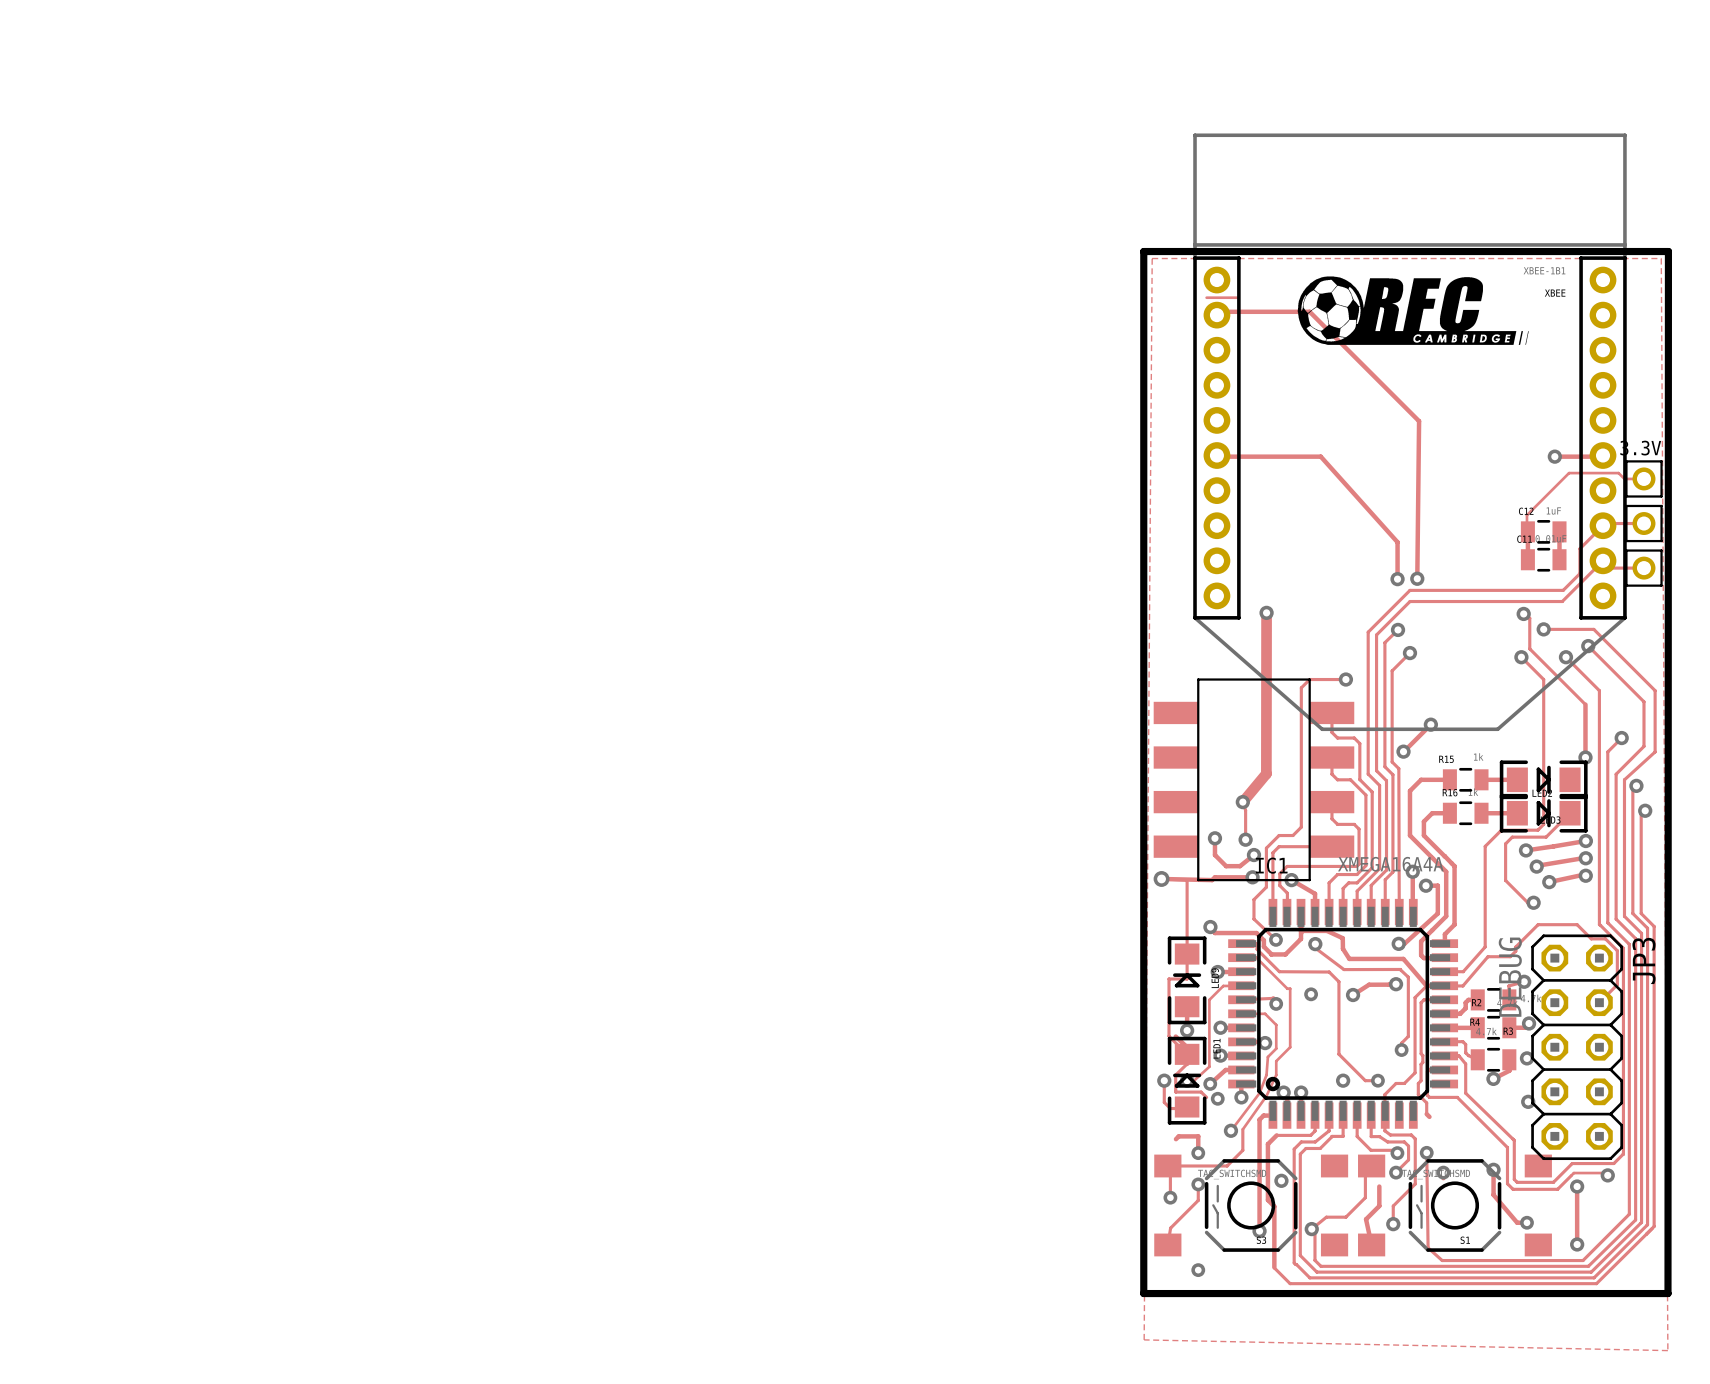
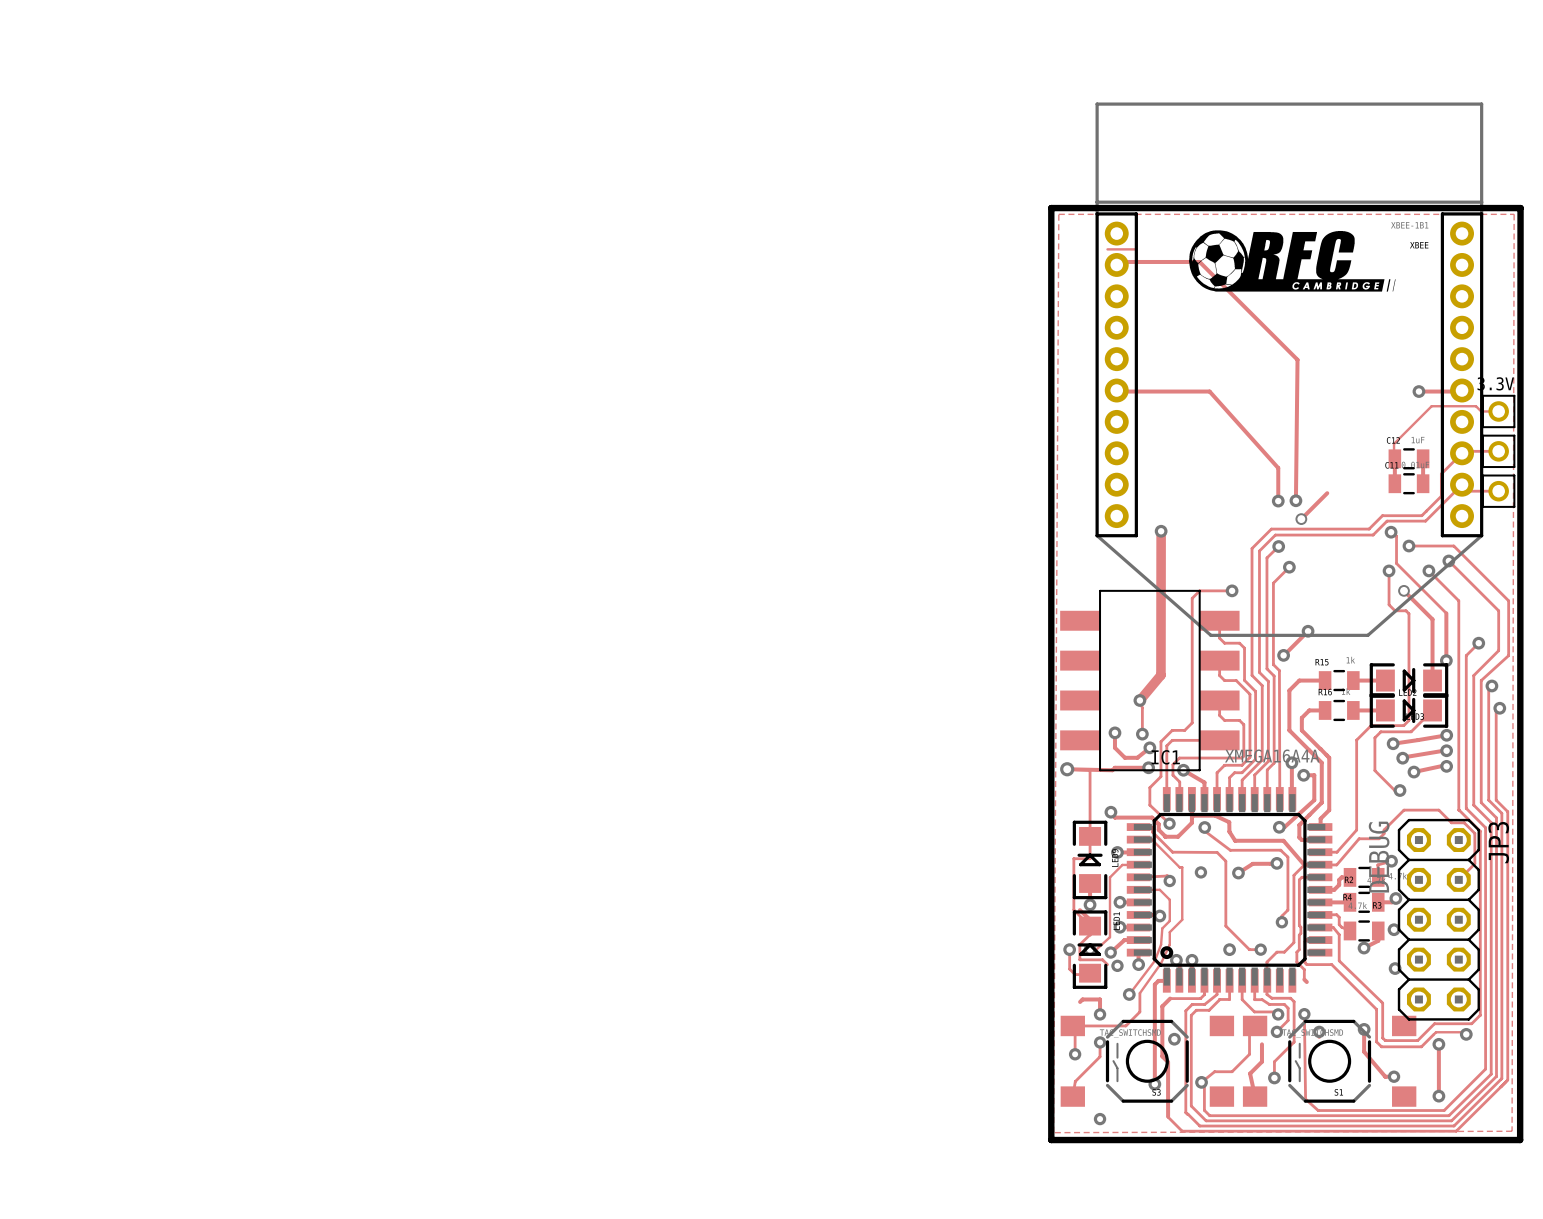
zone outline: (1152, 258) (1144, 1339) (1667, 1350) (1661, 258) -> (1058, 214) (1053, 1132) (1512, 1131) (1514, 214)
track: none -> (1327, 493) (1301, 519)
track: (1563, 590) (1409, 590) (1389, 610) -> (1426, 511) (1421, 515) (1382, 515) (1369, 529) (1271, 529)
via: none -> (1301, 519)
track: (1519, 601) (1409, 601) (1394, 617) -> (1387, 521) (1373, 535) (1275, 535)
track: (1521, 657) (1543, 679) (1543, 705) -> (1389, 570) (1389, 604) (1395, 610) (1405, 610) (1408, 613)
track: none -> (1403, 590) (1432, 619) (1432, 680)
via: none -> (1403, 590)

